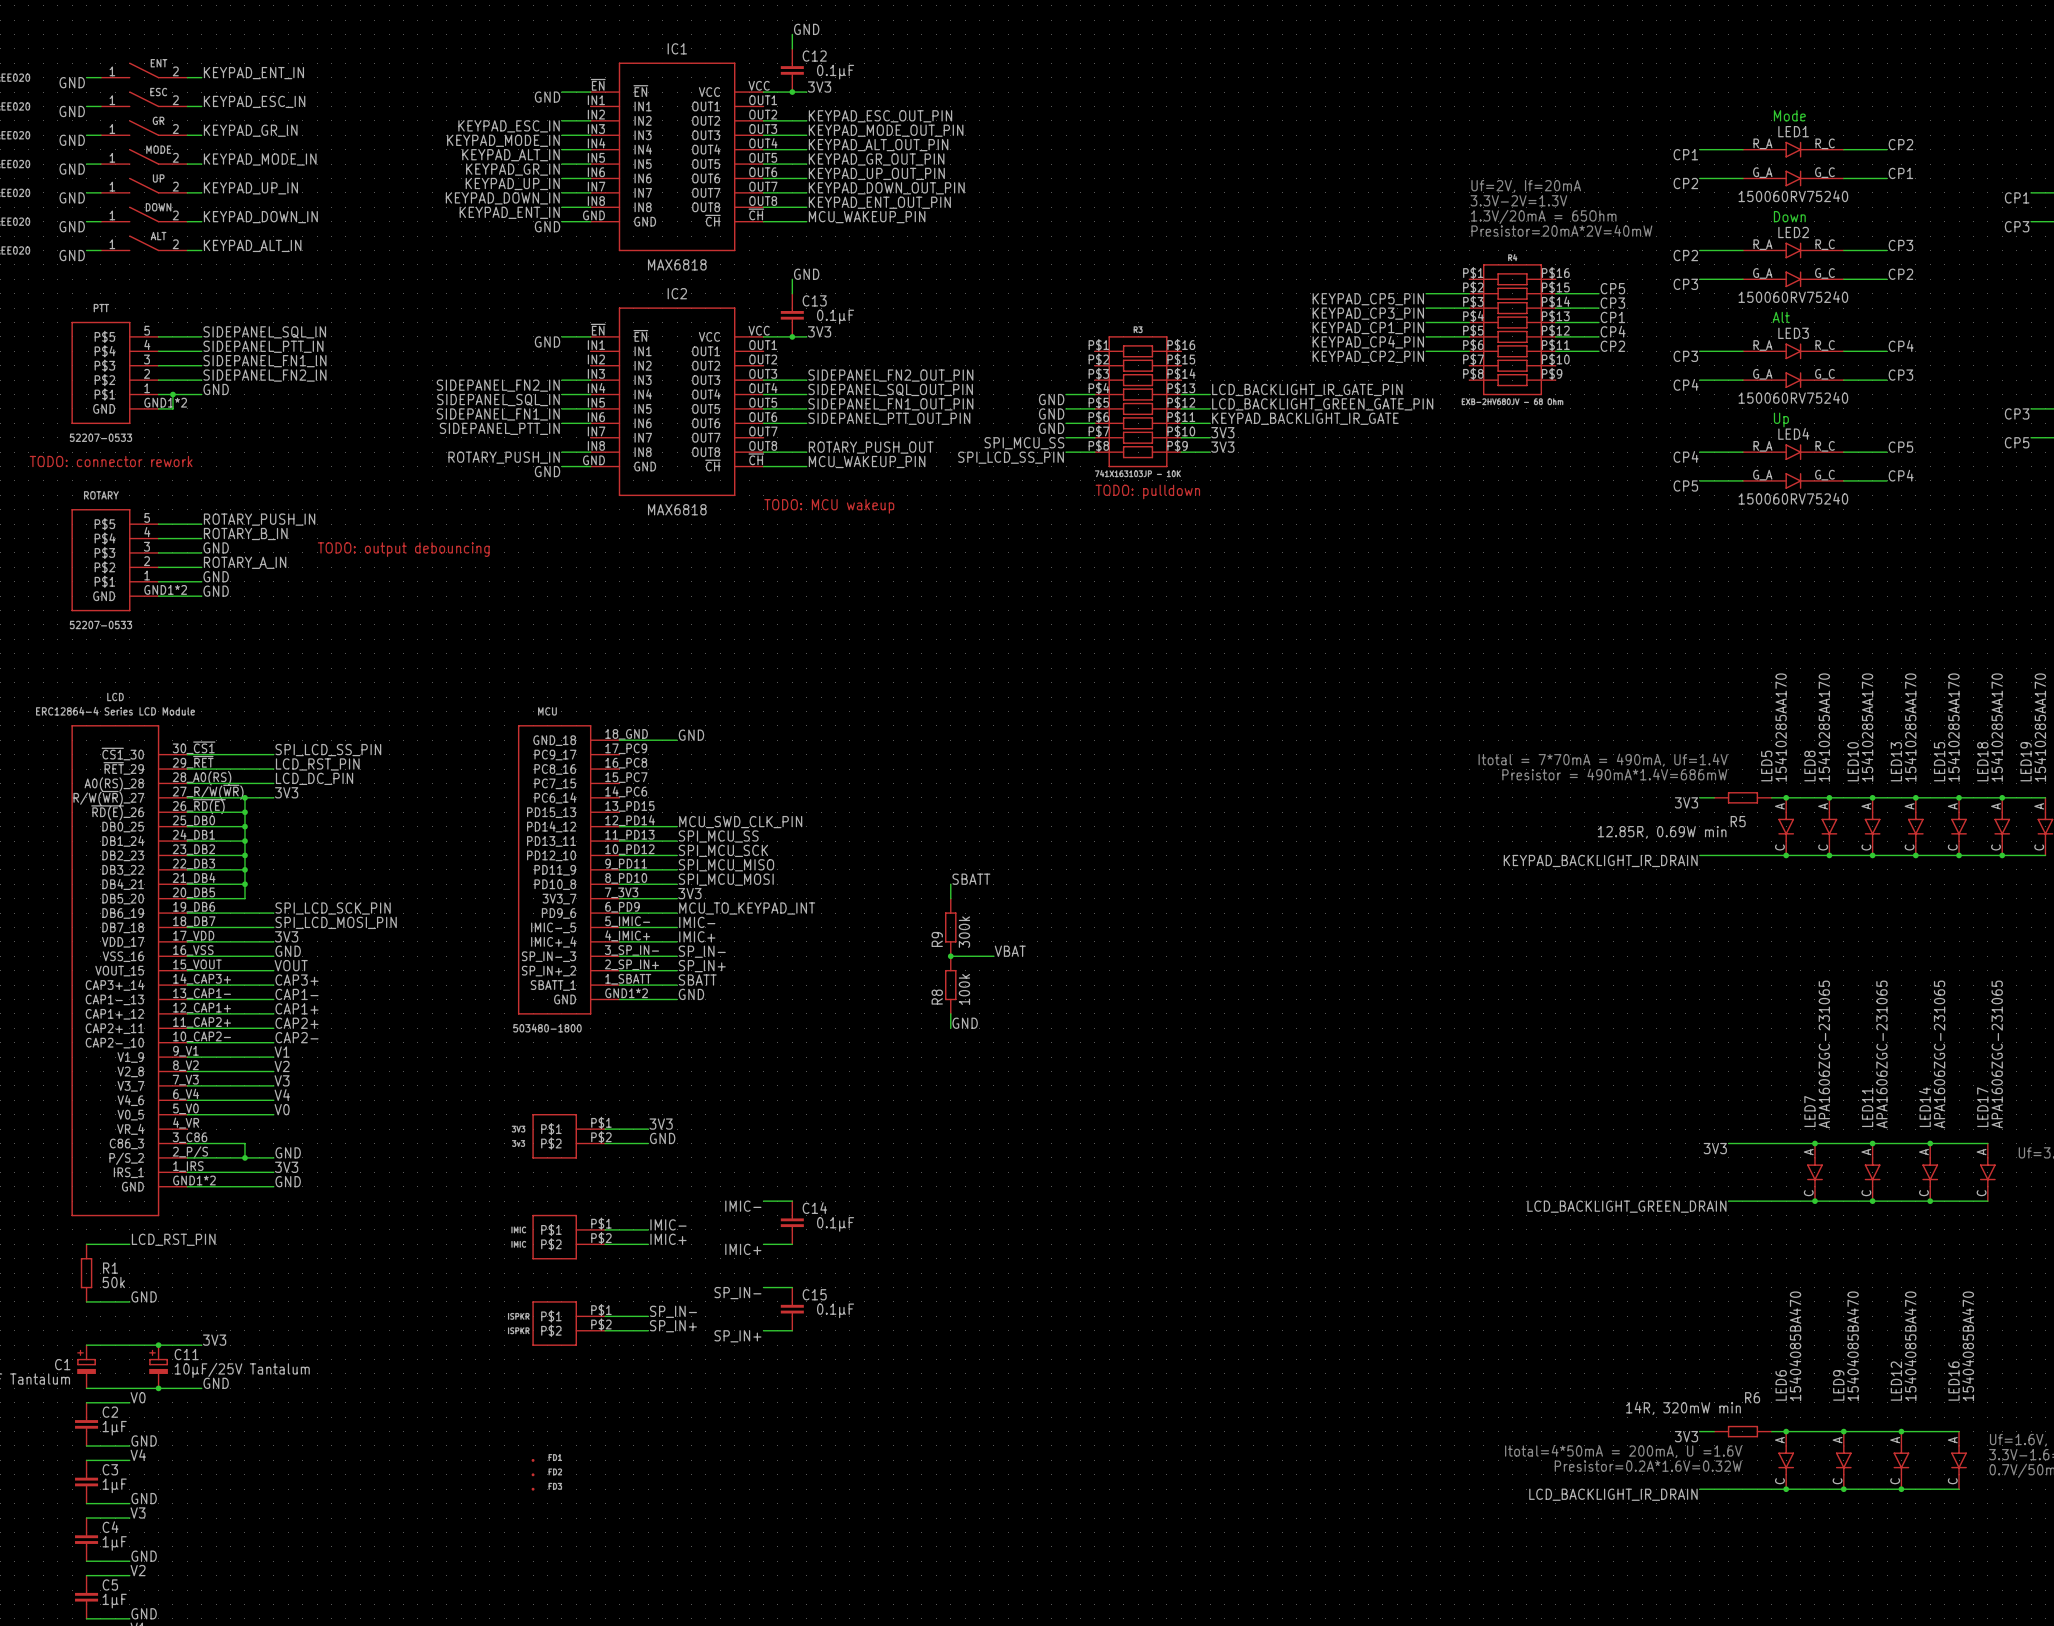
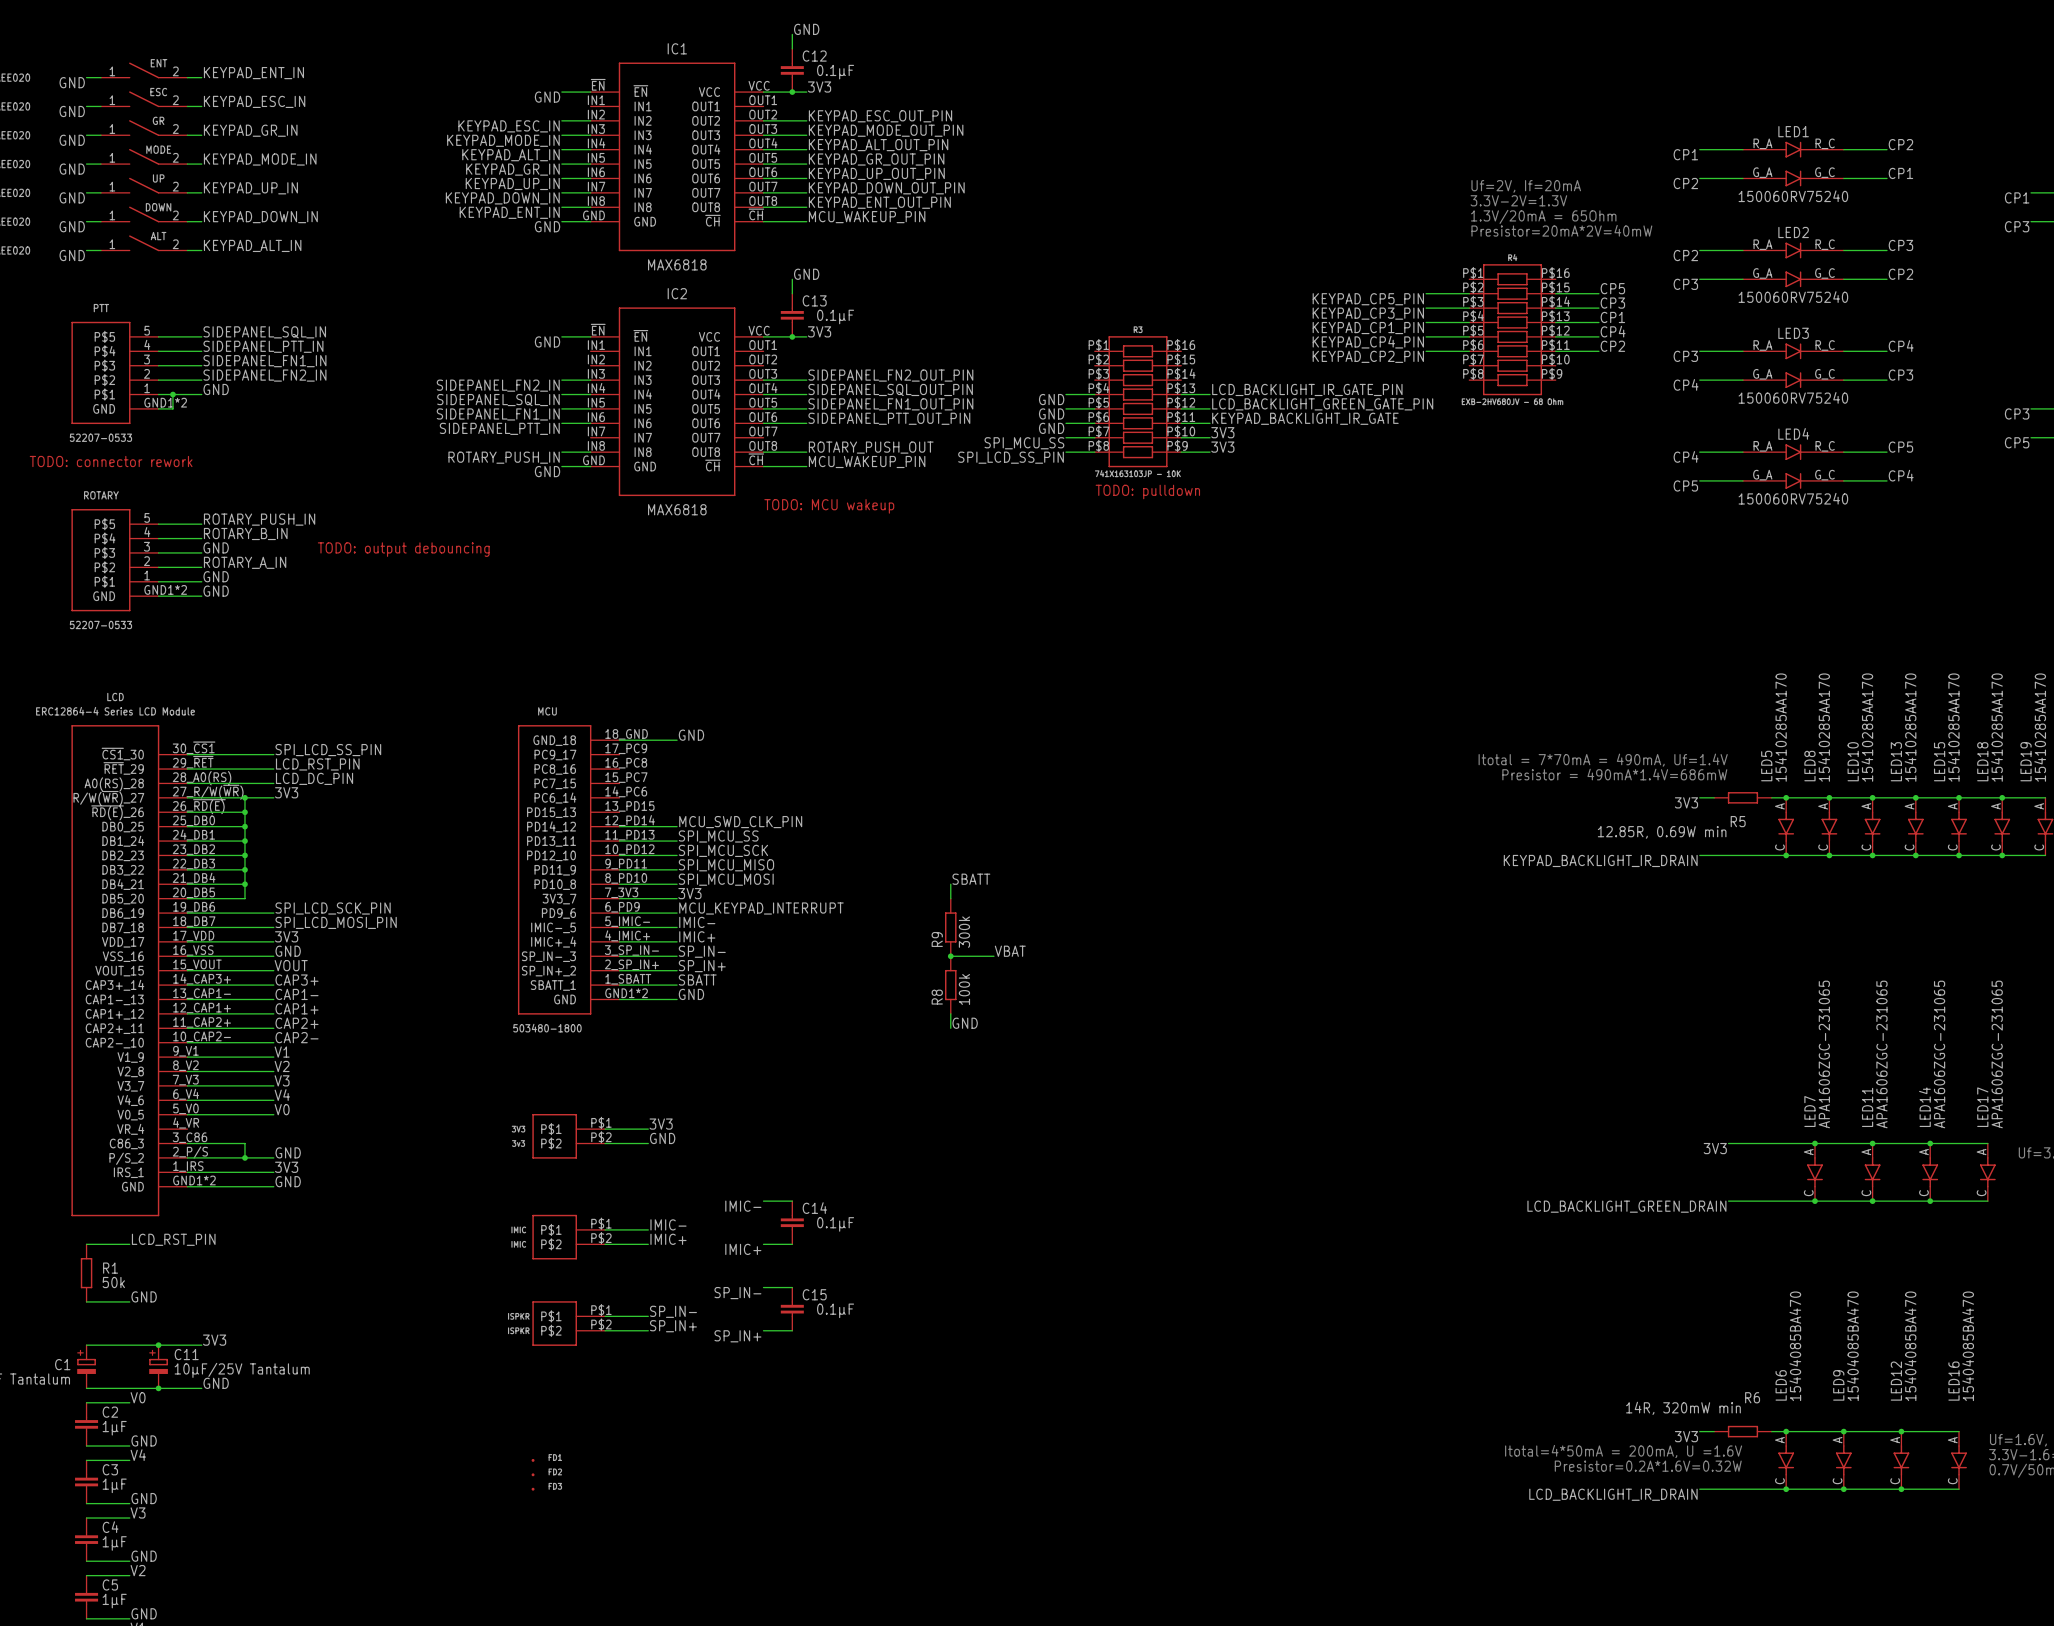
text: Mode (1789, 115) -> none
text: Down (1789, 216) -> none
text: Alt (1781, 317) -> none
text: Up (1781, 419) -> none
label: MCU_TO_KEYPAD_INT (747, 908) -> MCU_KEYPAD_INTERRUPT (761, 908)

